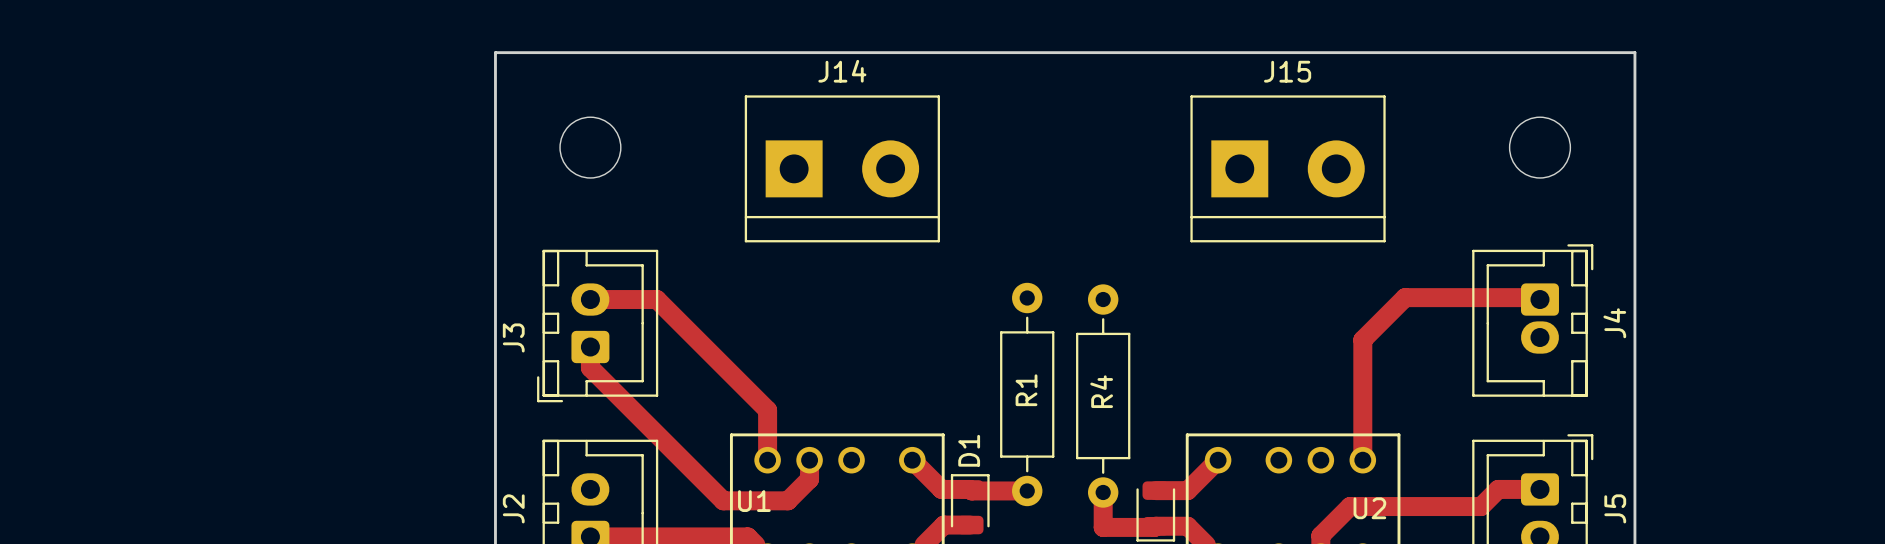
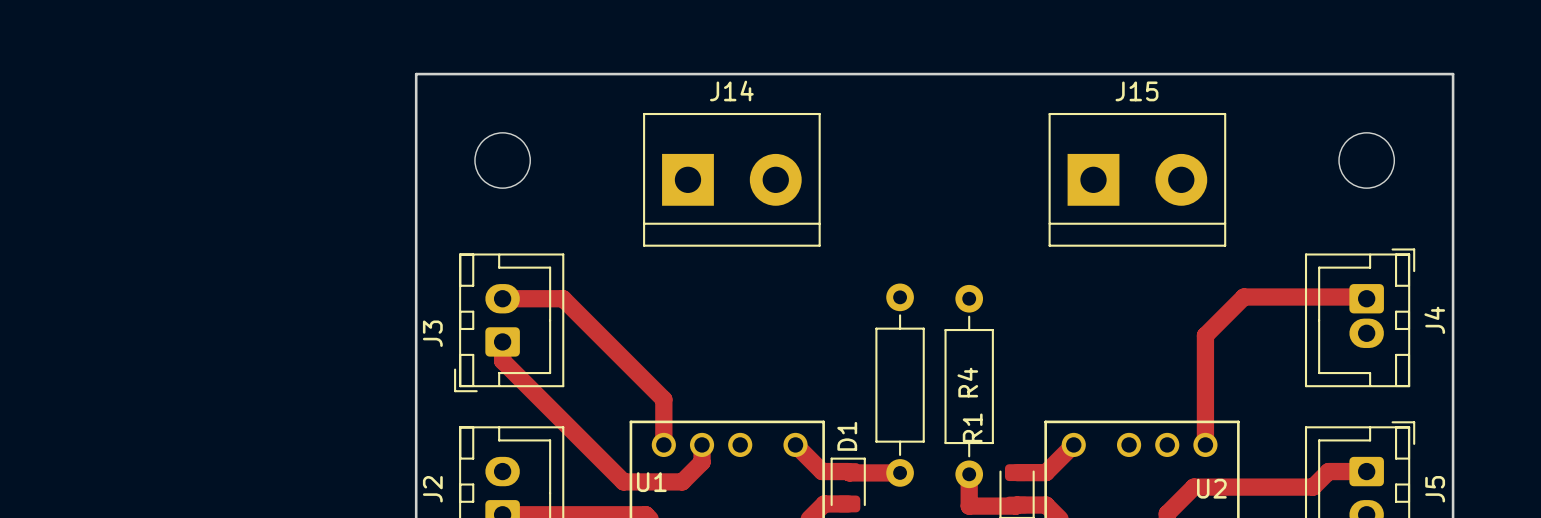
R1 name position: R1 (1026, 390) -> R1 (972, 427)

